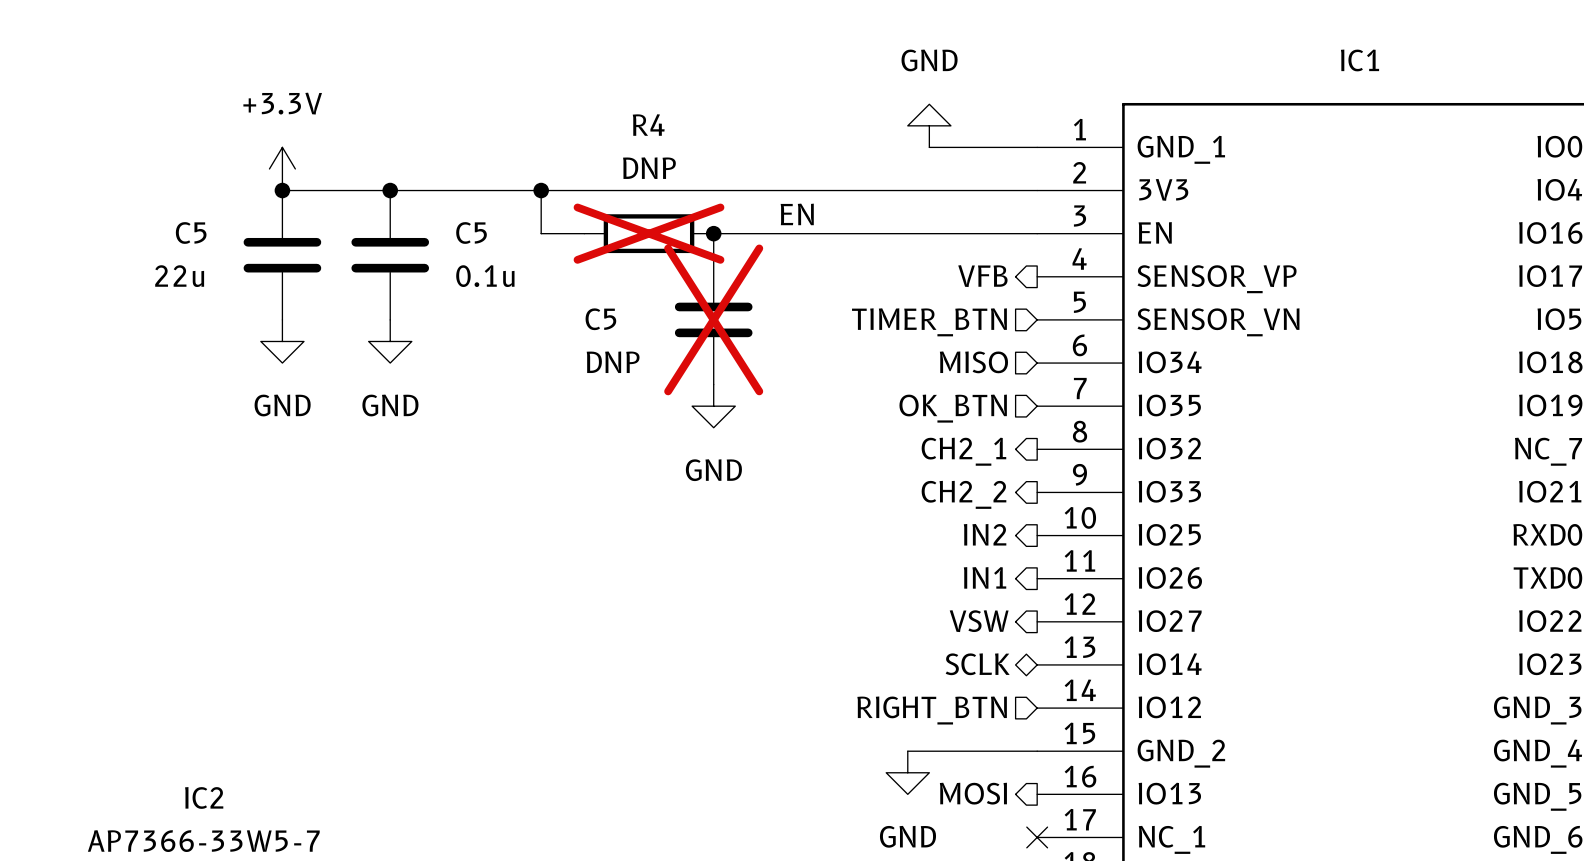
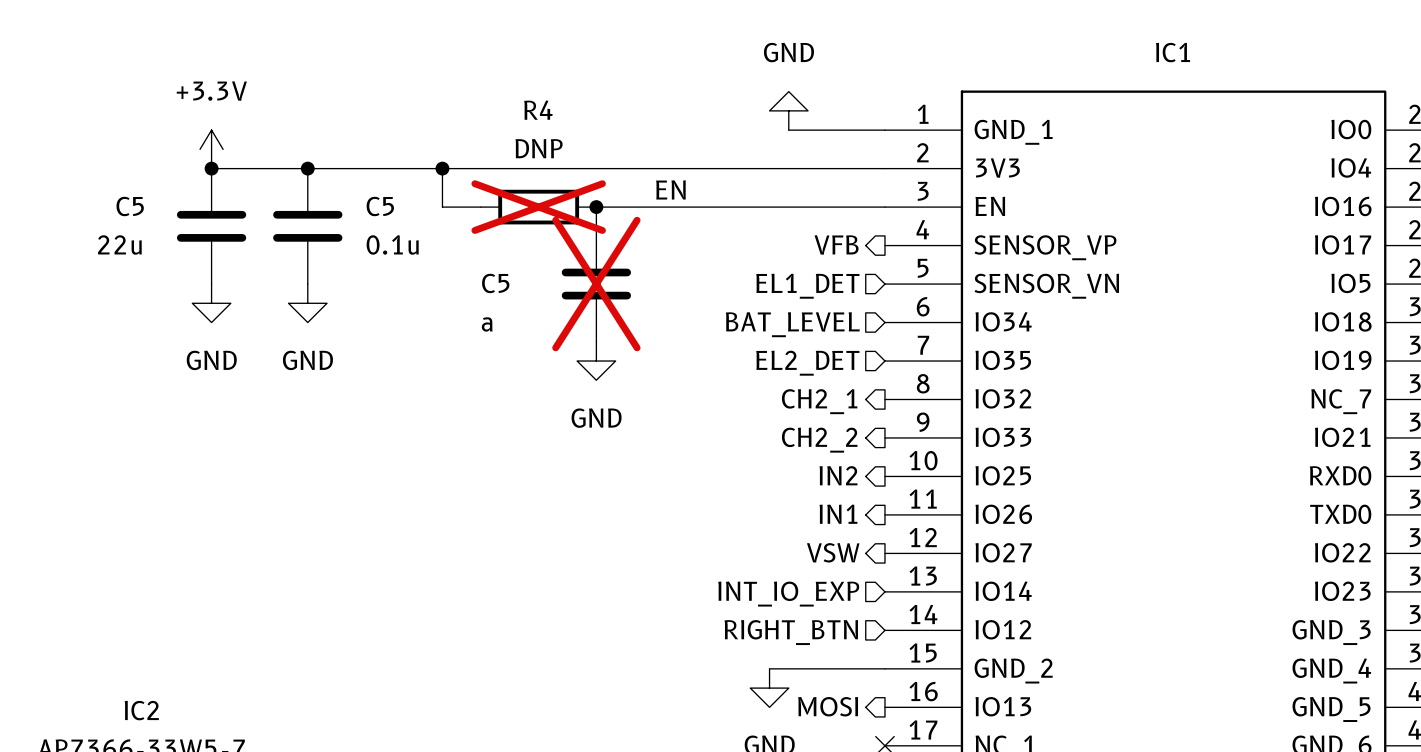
hierarchical label: TIMER_BTN (929, 322) -> EL1_DET (807, 286)
C5 value: DNP (613, 362) -> a (487, 324)
hierarchical label: MISO (973, 362) -> BAT_LEVEL (792, 324)
hierarchical label: OK_BTN (953, 408) -> EL2_DET (807, 363)
hierarchical label shape: bidirectional (977, 664) -> input (788, 594)
hierarchical label: SCLK (977, 664) -> INT_IO_EXP (788, 594)

